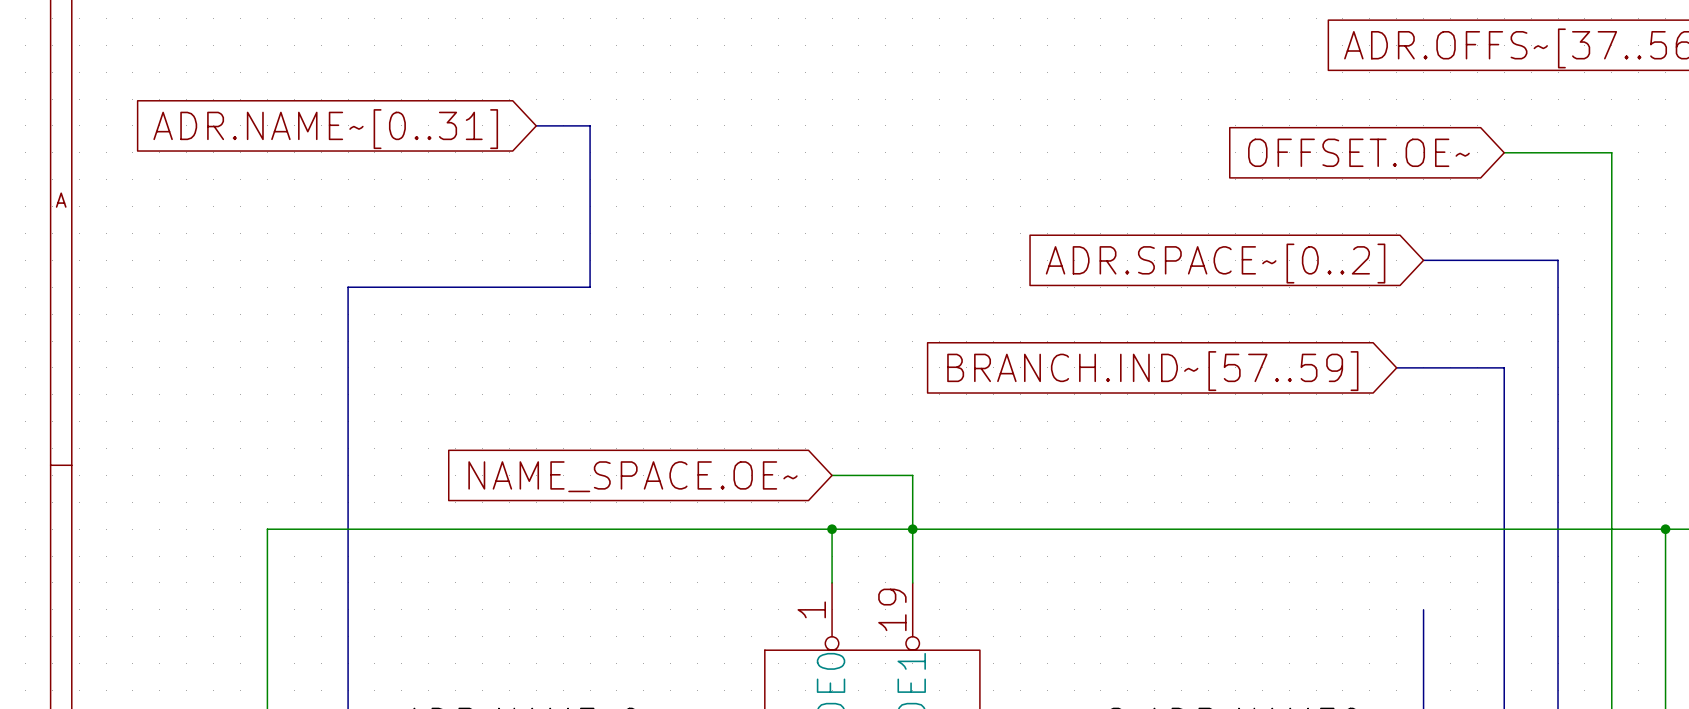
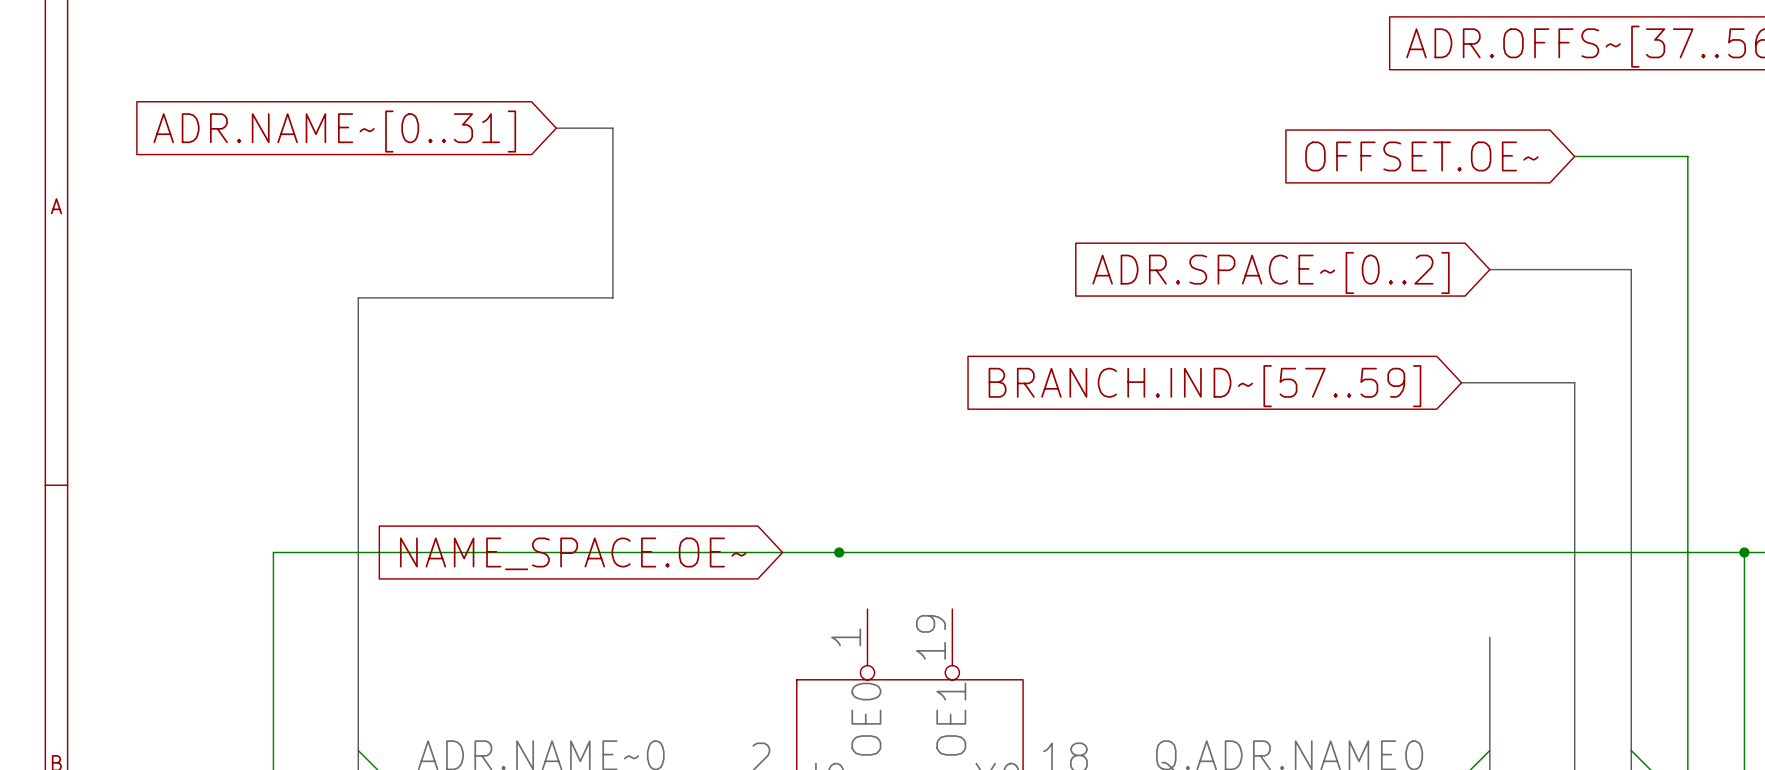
wire: (832, 475) (912, 475) (912, 582) -> none
global label position: NAME_SPACE.OE~ (633, 476) -> NAME_SPACE.OE~ (573, 553)
wire: (832, 529) (832, 582) -> none
junction position: (832, 529) -> (839, 552)
junction: (912, 529) -> none

